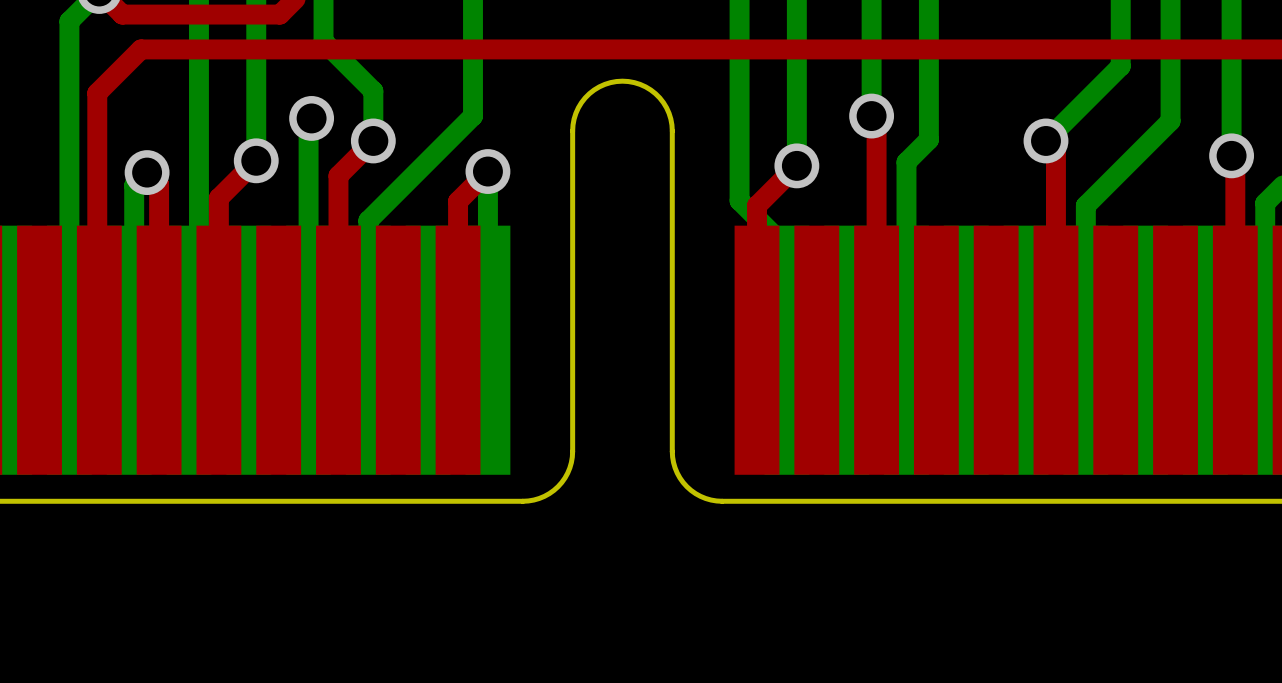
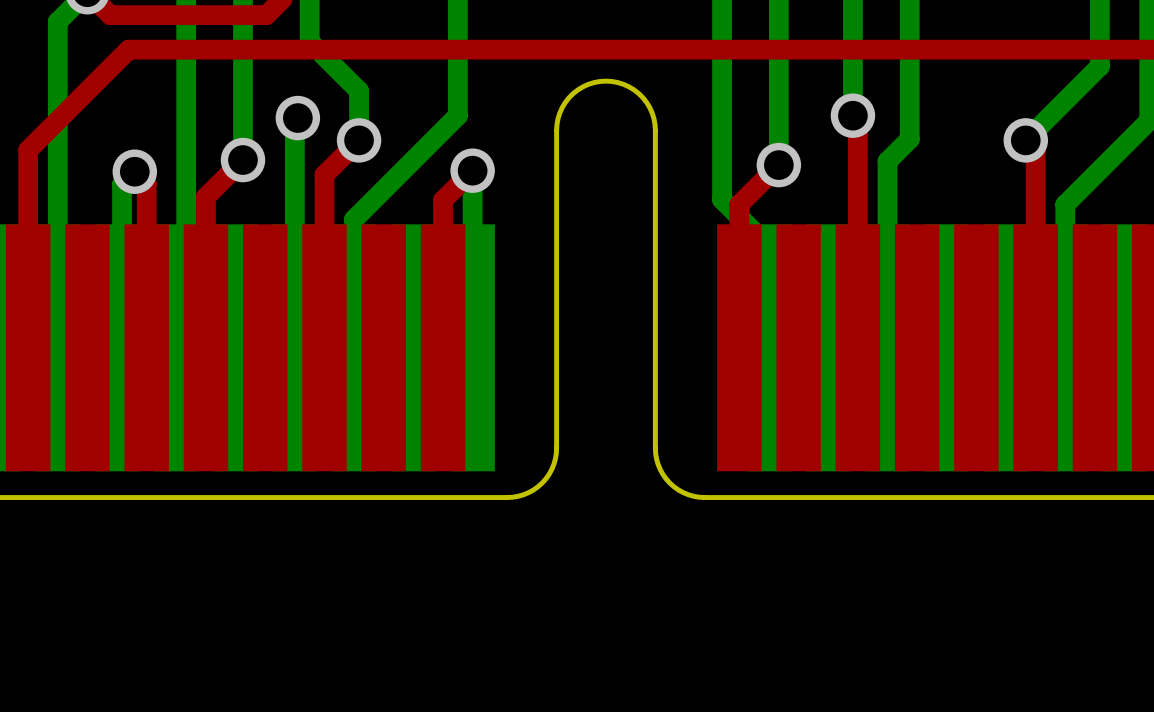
top track: (97, 93) (97, 348) (99, 350) -> (85, 93) (28, 150) (28, 347)

